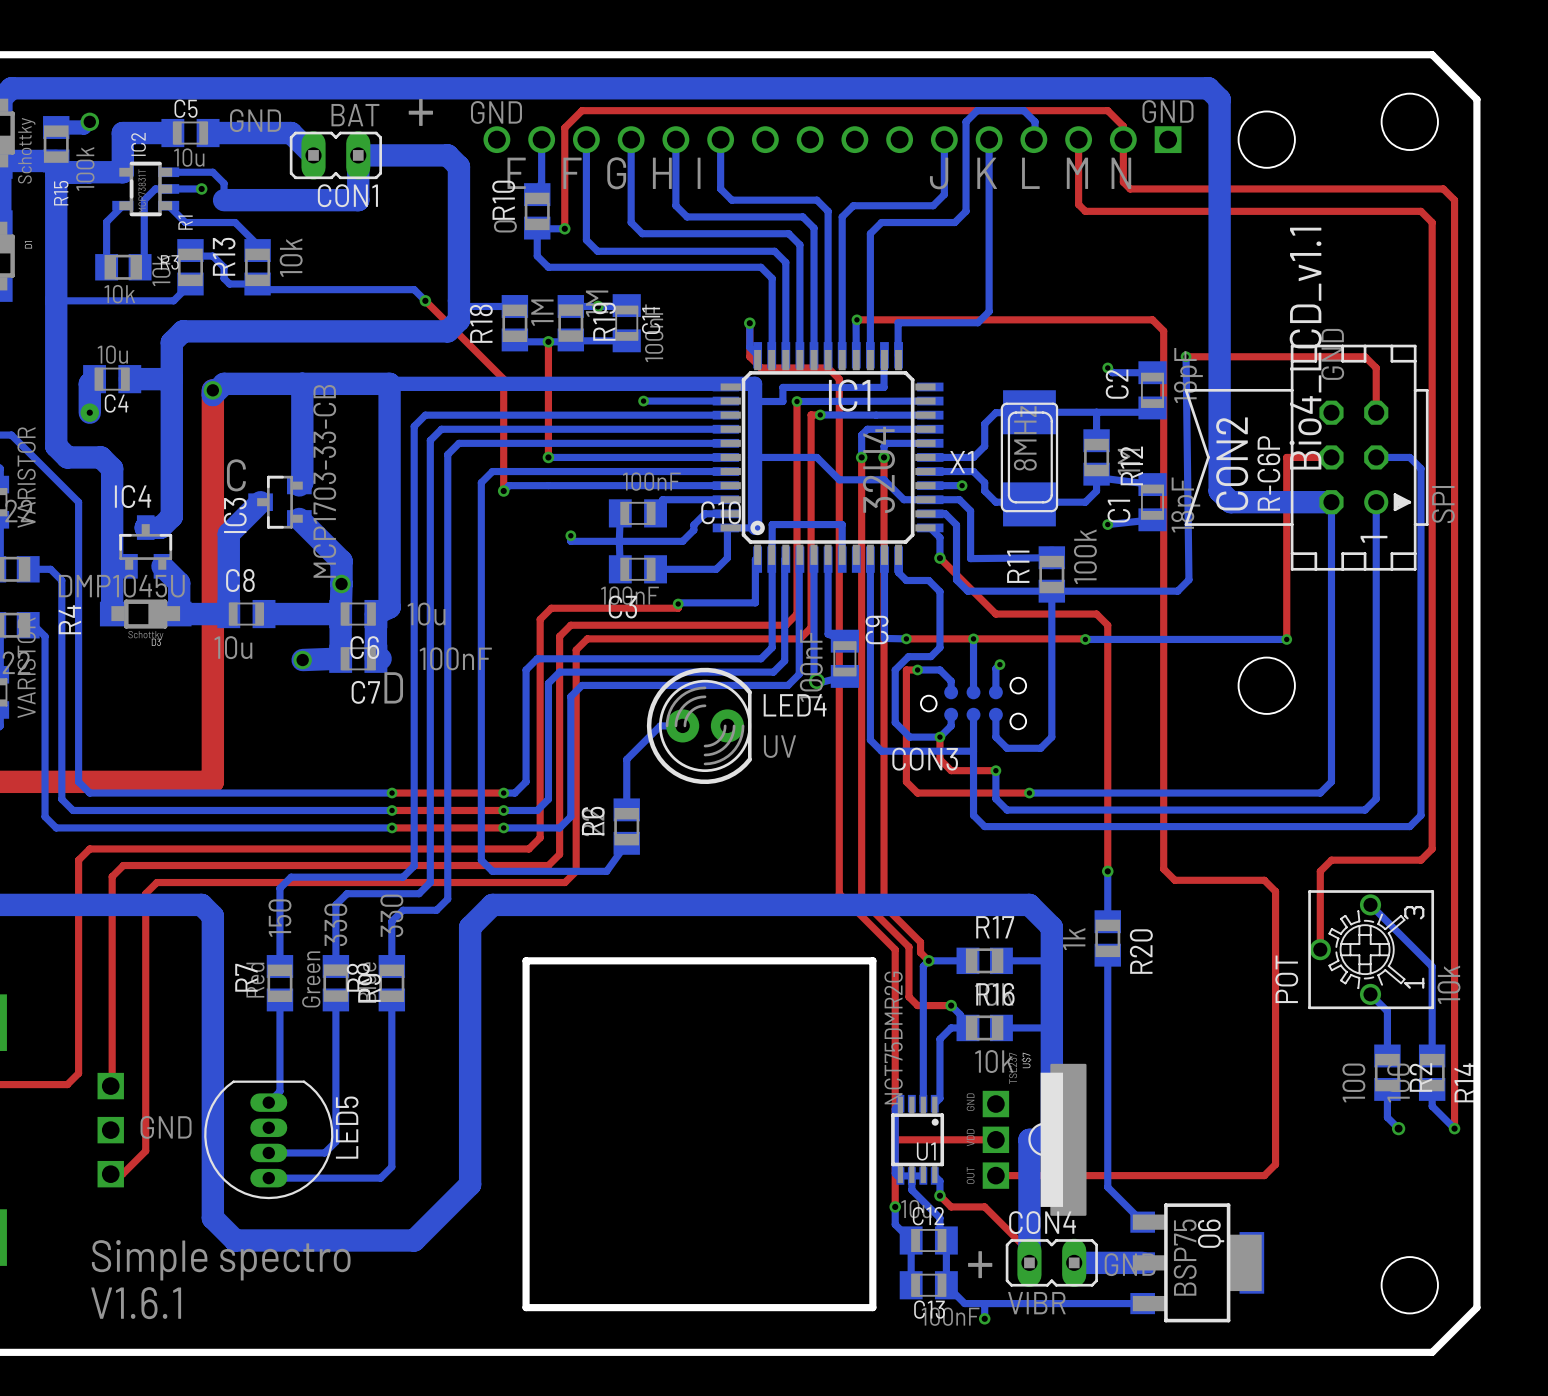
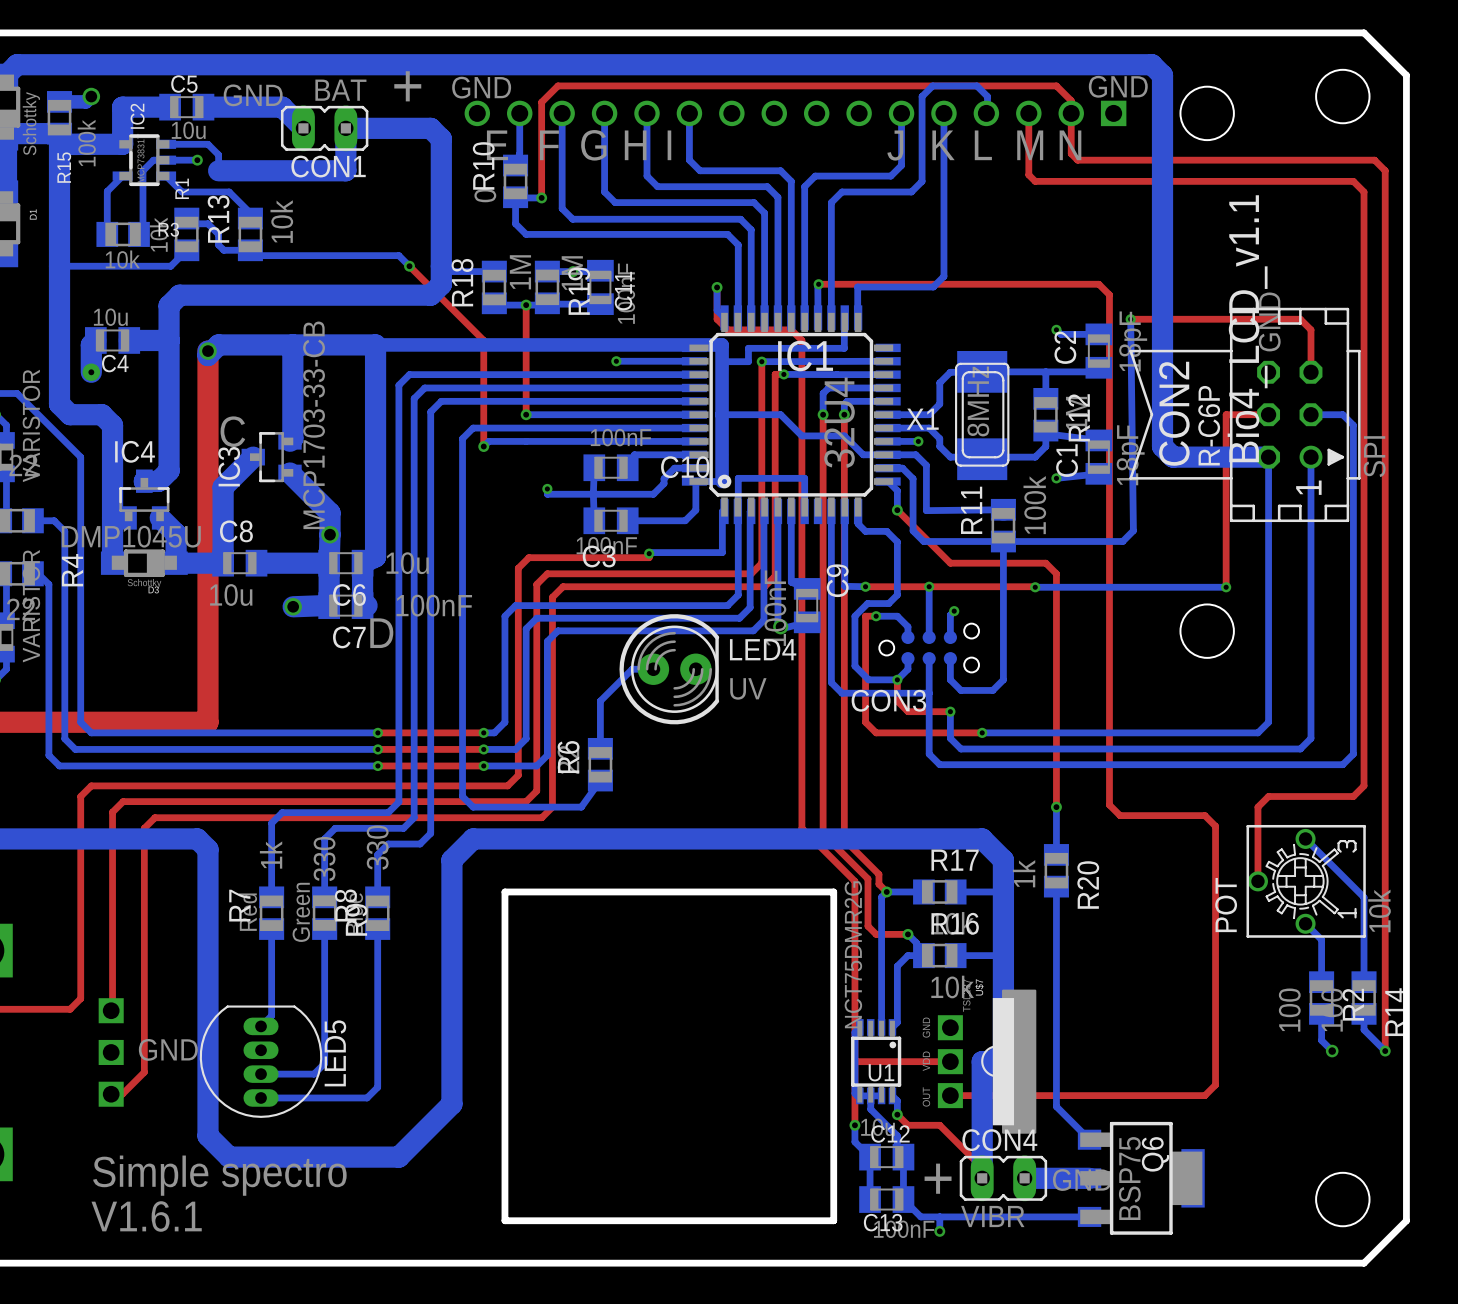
R7 value: 150 (279, 918) -> 1k (271, 855)

